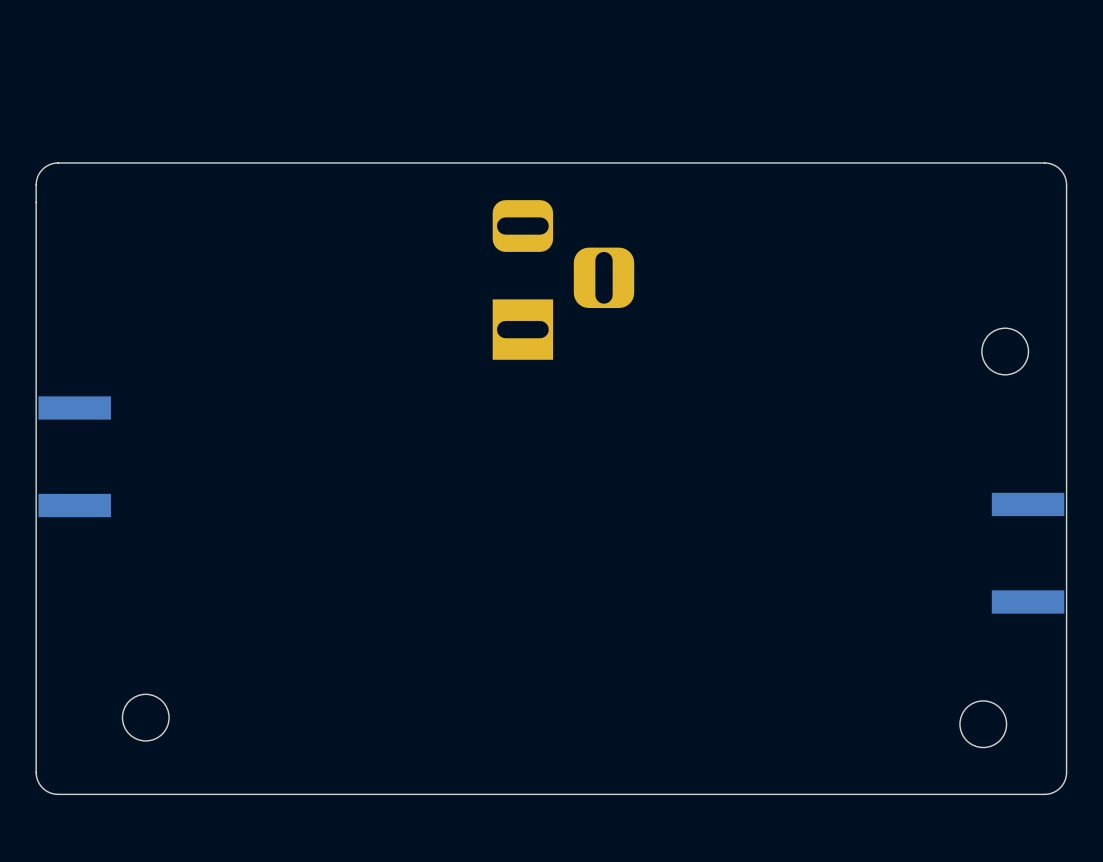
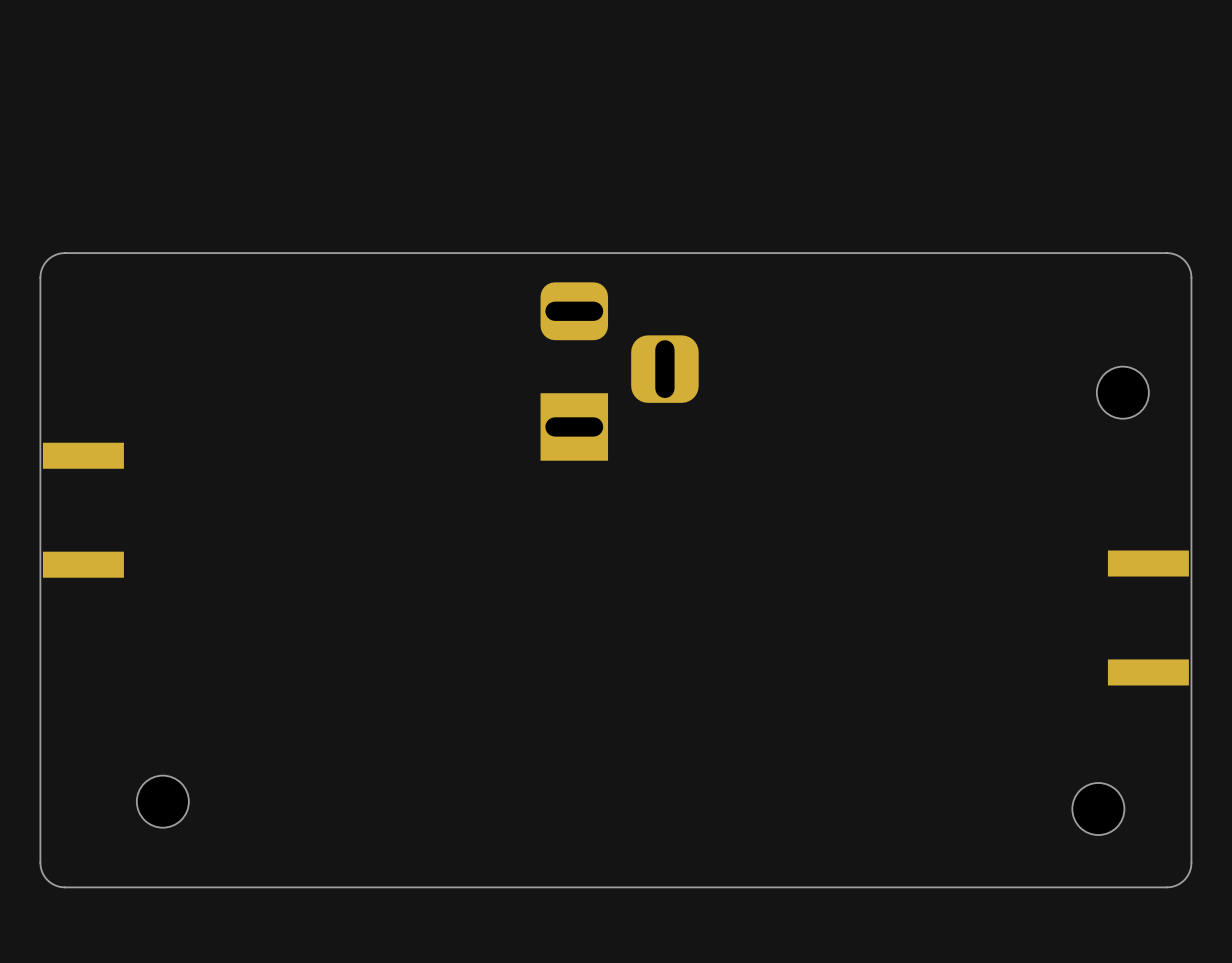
board edge: (1066, 248) (1065, 179) (1057, 167) (1044, 162) (55, 163) (44, 167) (36, 179) (36, 248) -> (1191, 277) (1189, 268) (1184, 260) (1176, 254) (1166, 253) (64, 253) (55, 254) (47, 260) (42, 268) (40, 277)
part position: (563, 279) -> (619, 371)

